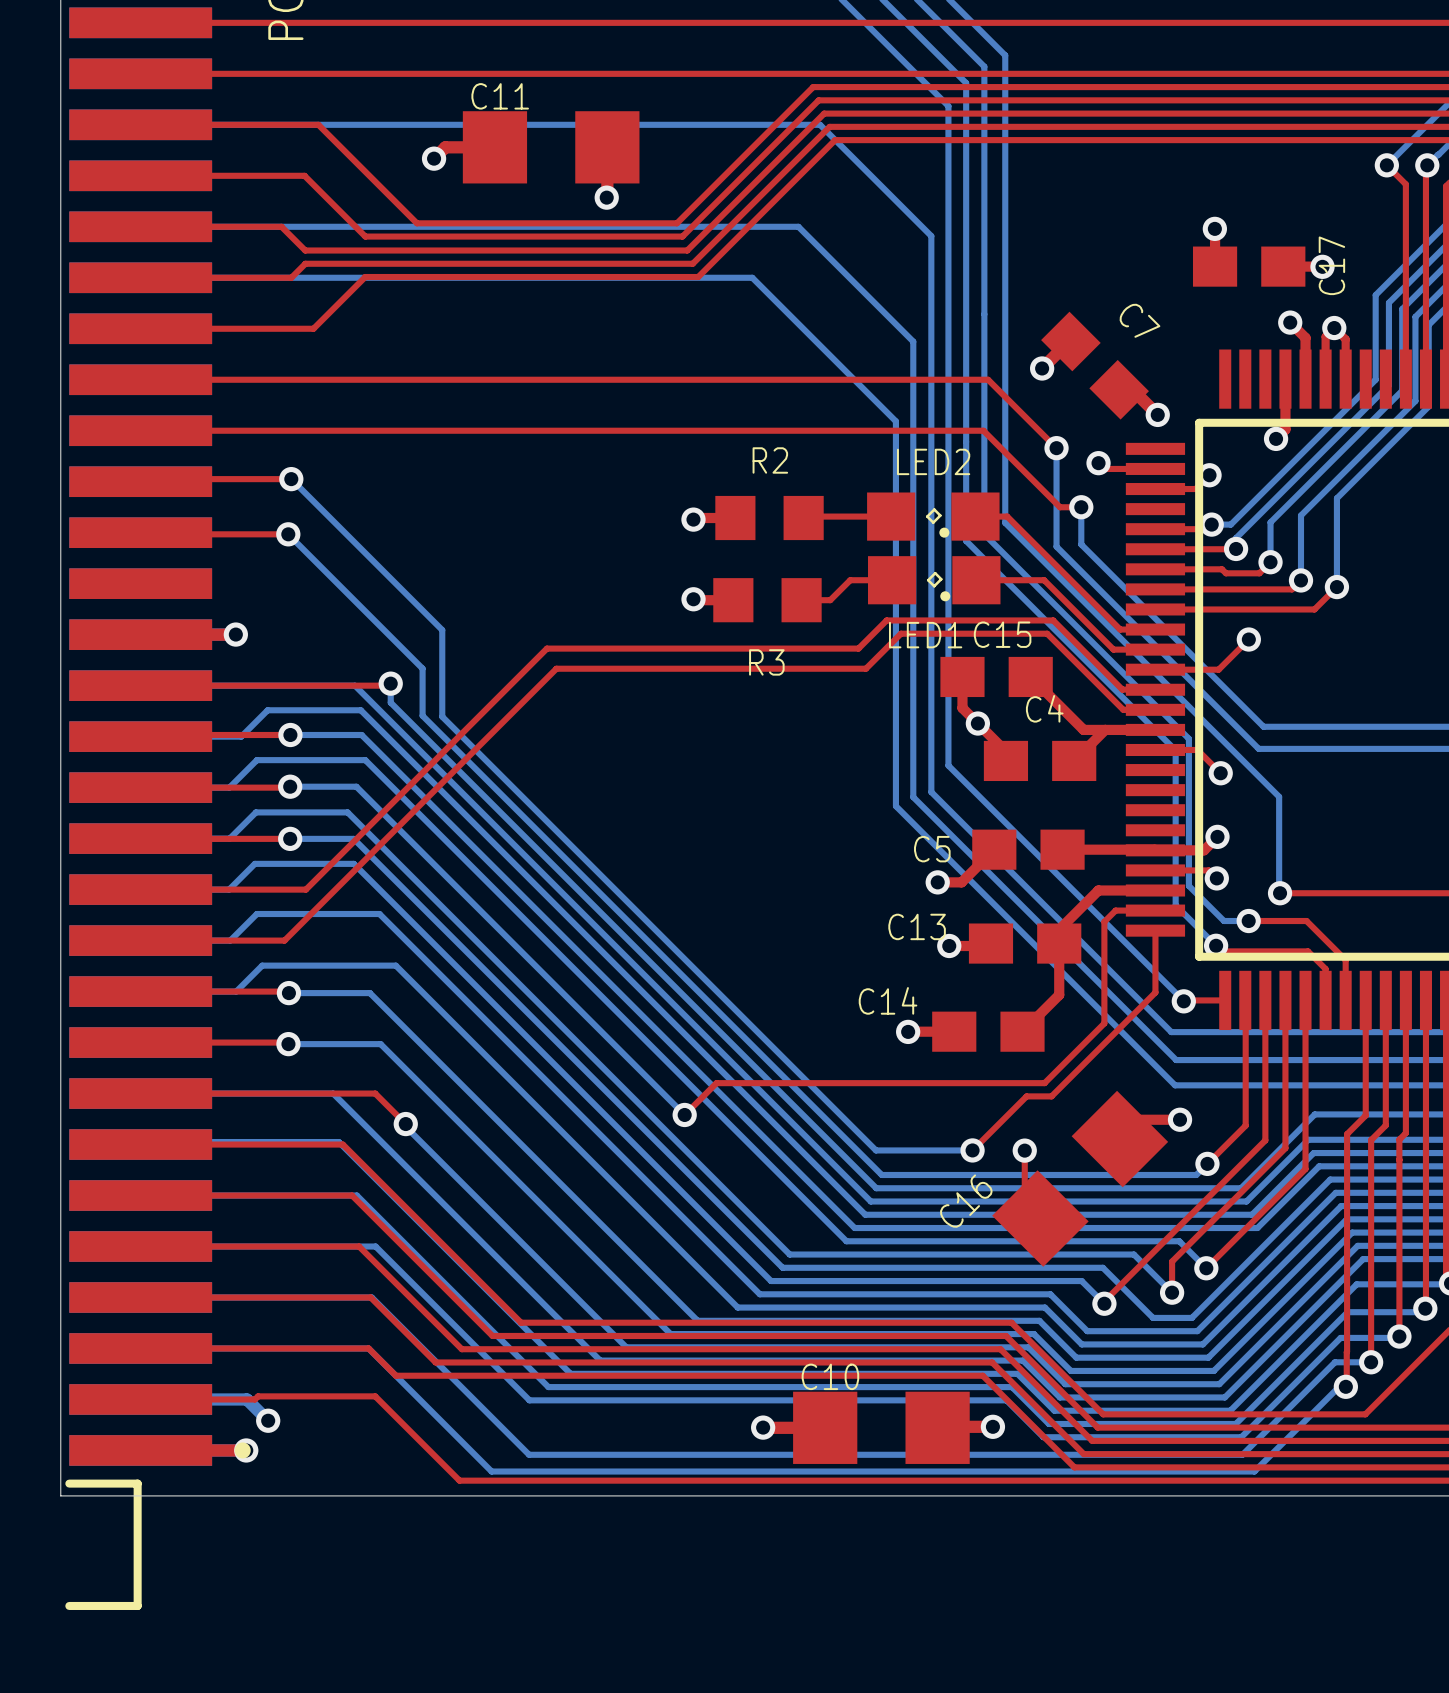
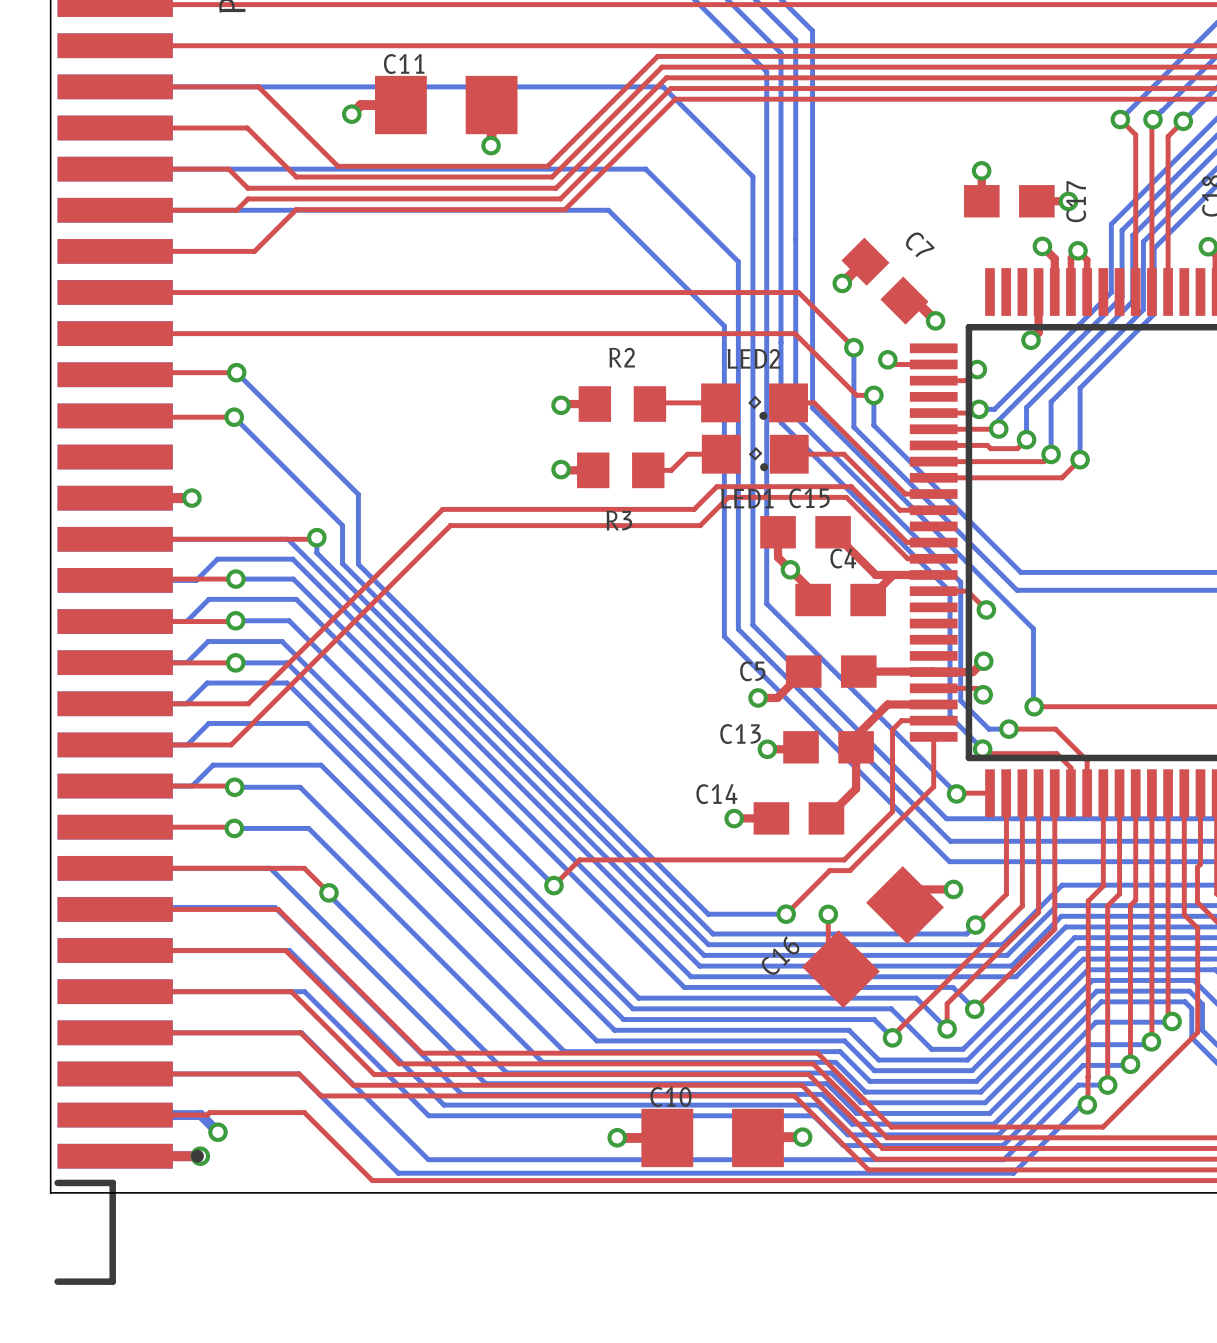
top track: (1248, 639) (1218, 669) (1155, 669) -> none
via: (1248, 639) -> none

